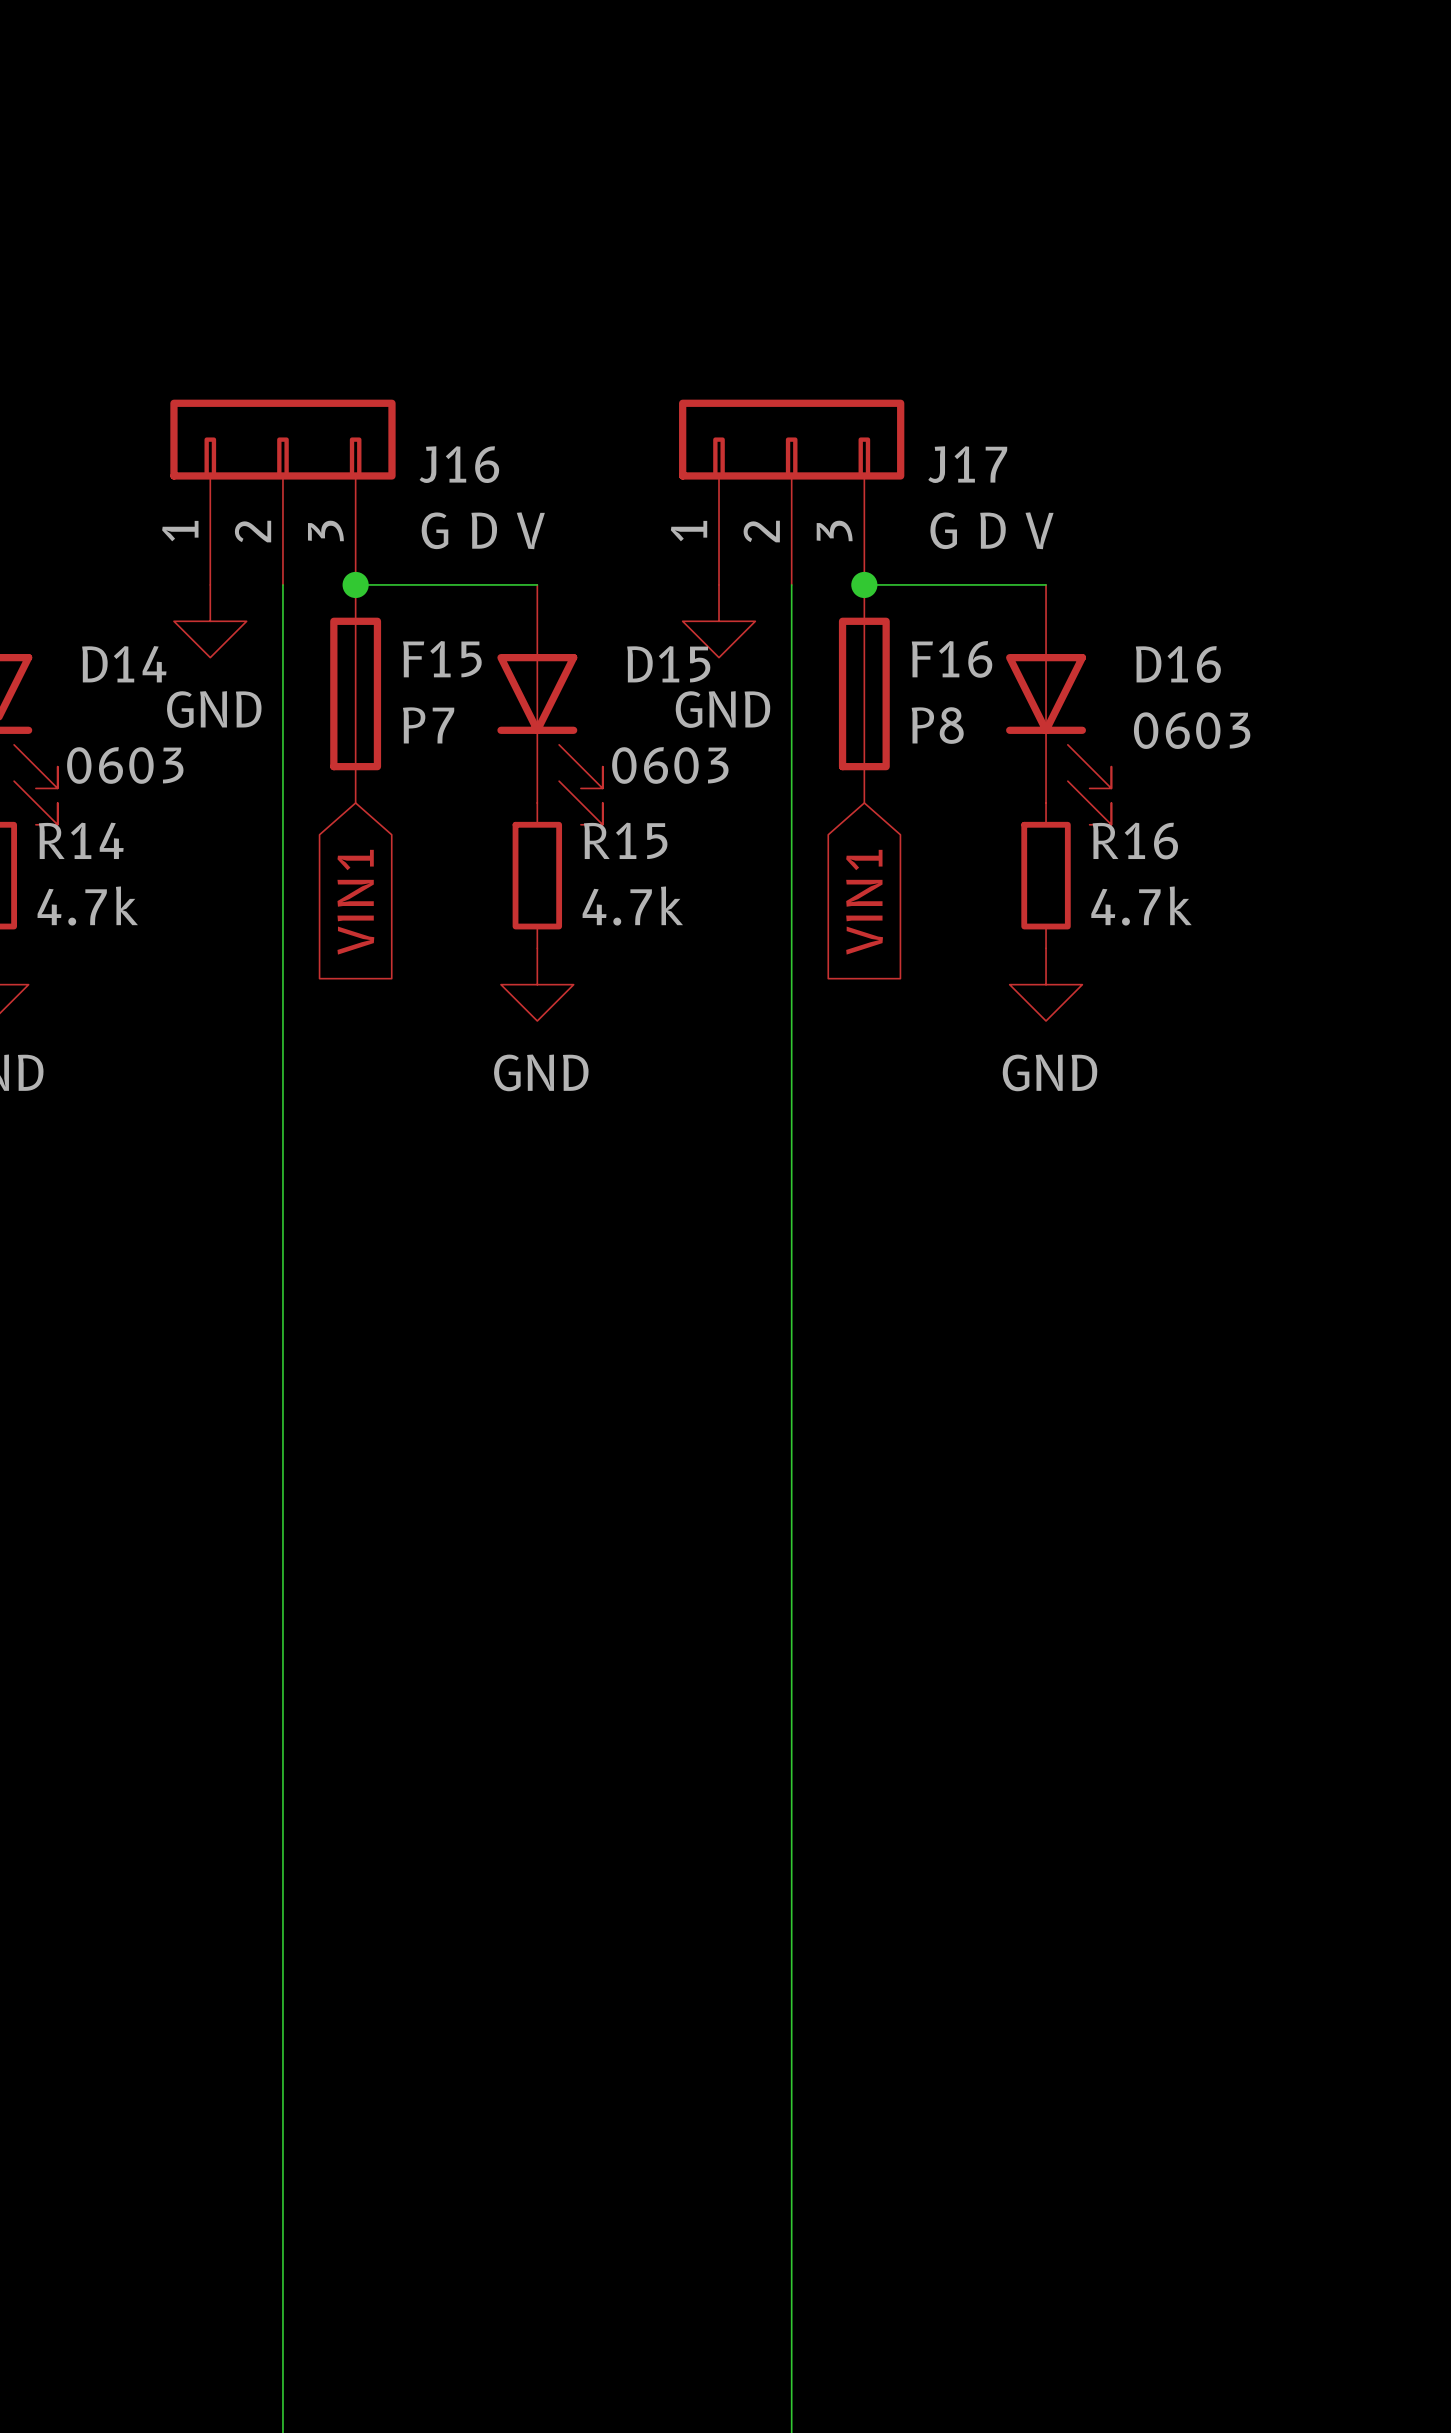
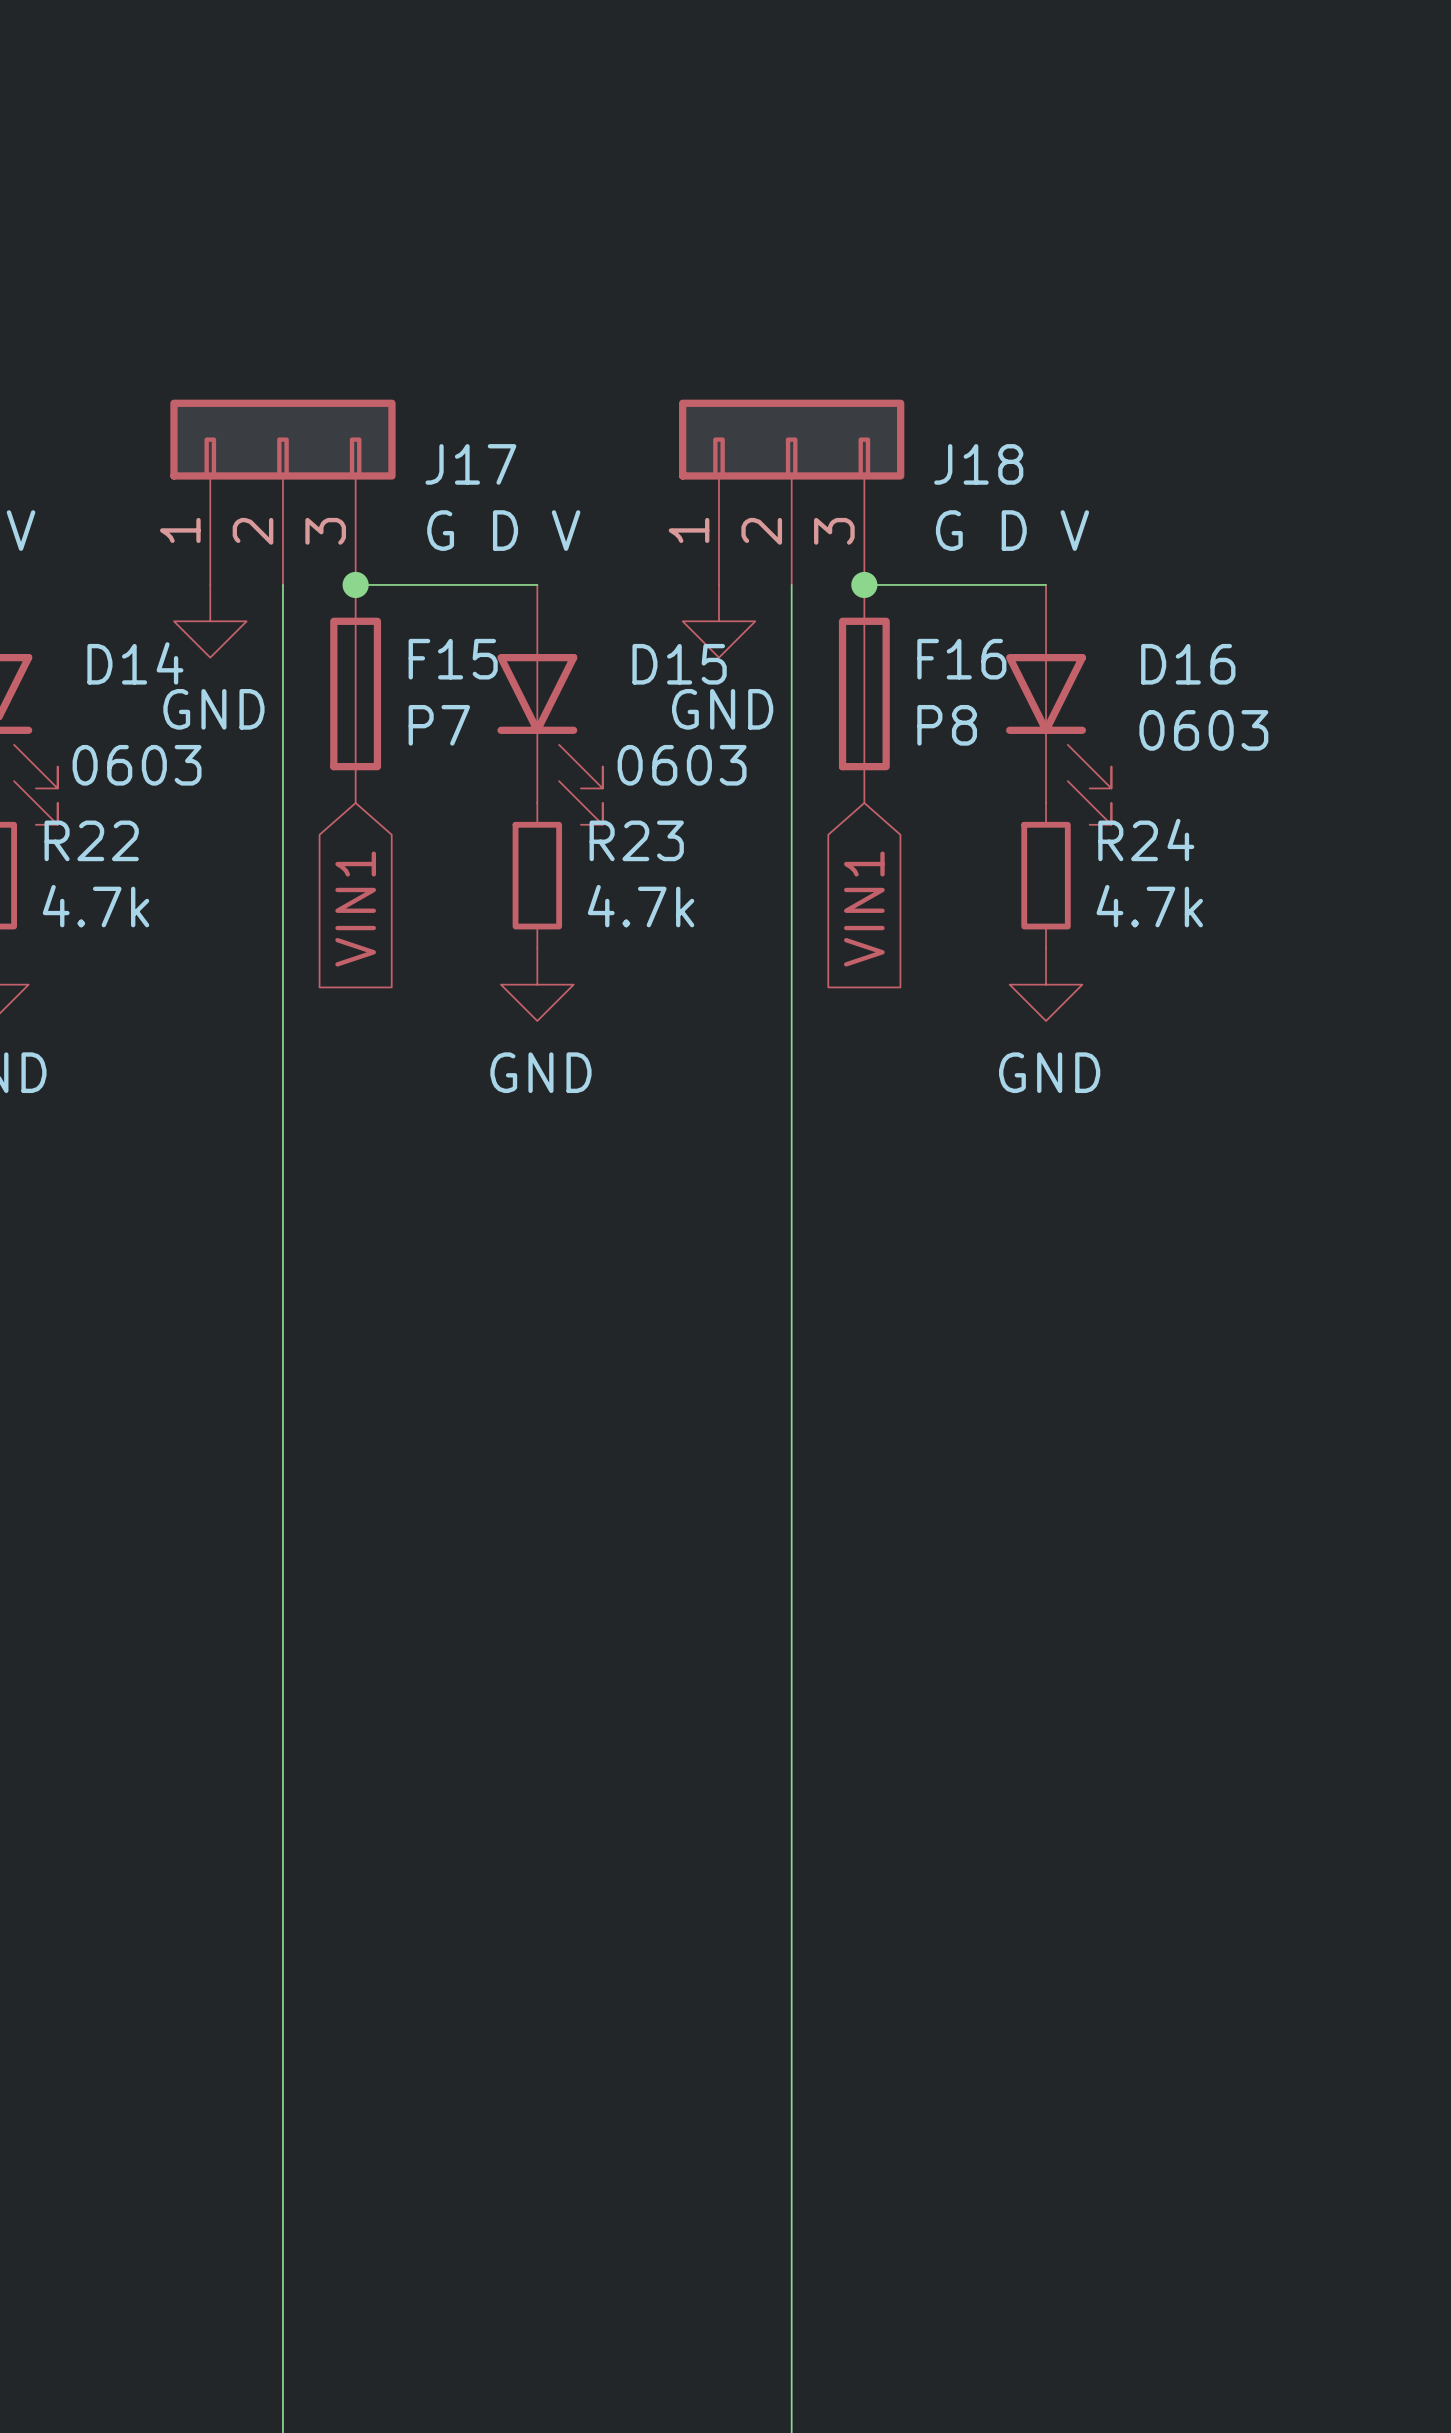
J16 name: J16 (459, 464) -> J17 (470, 464)
J17 name: J17 (967, 464) -> J18 (978, 464)
R14 name: R14 (81, 840) -> R22 (91, 840)
R15 name: R15 (625, 840) -> R23 (636, 840)
R16 name: R16 (1135, 841) -> R24 (1146, 839)

